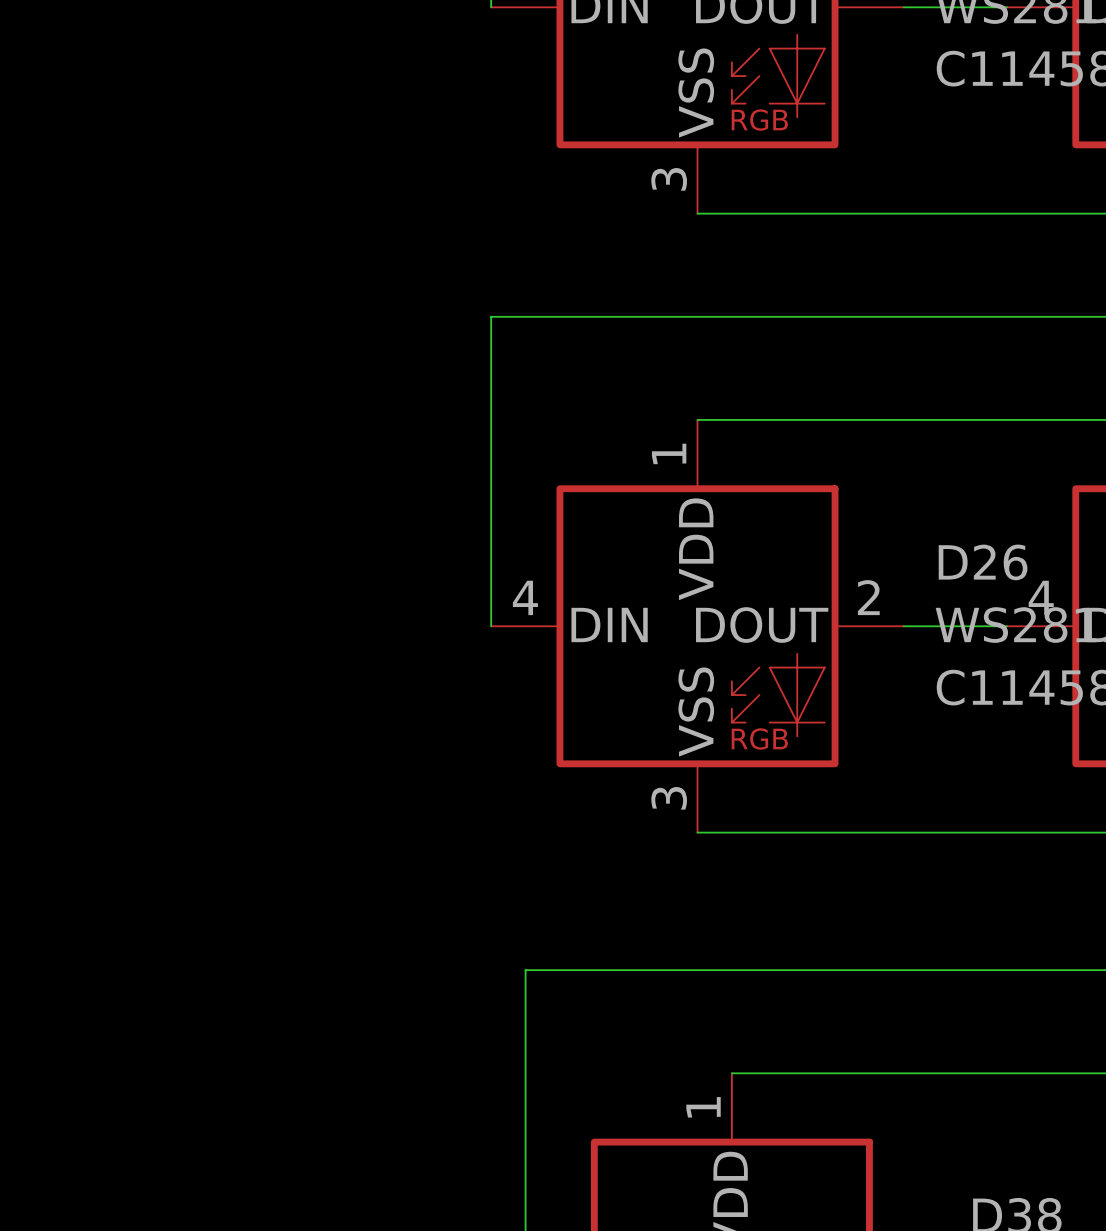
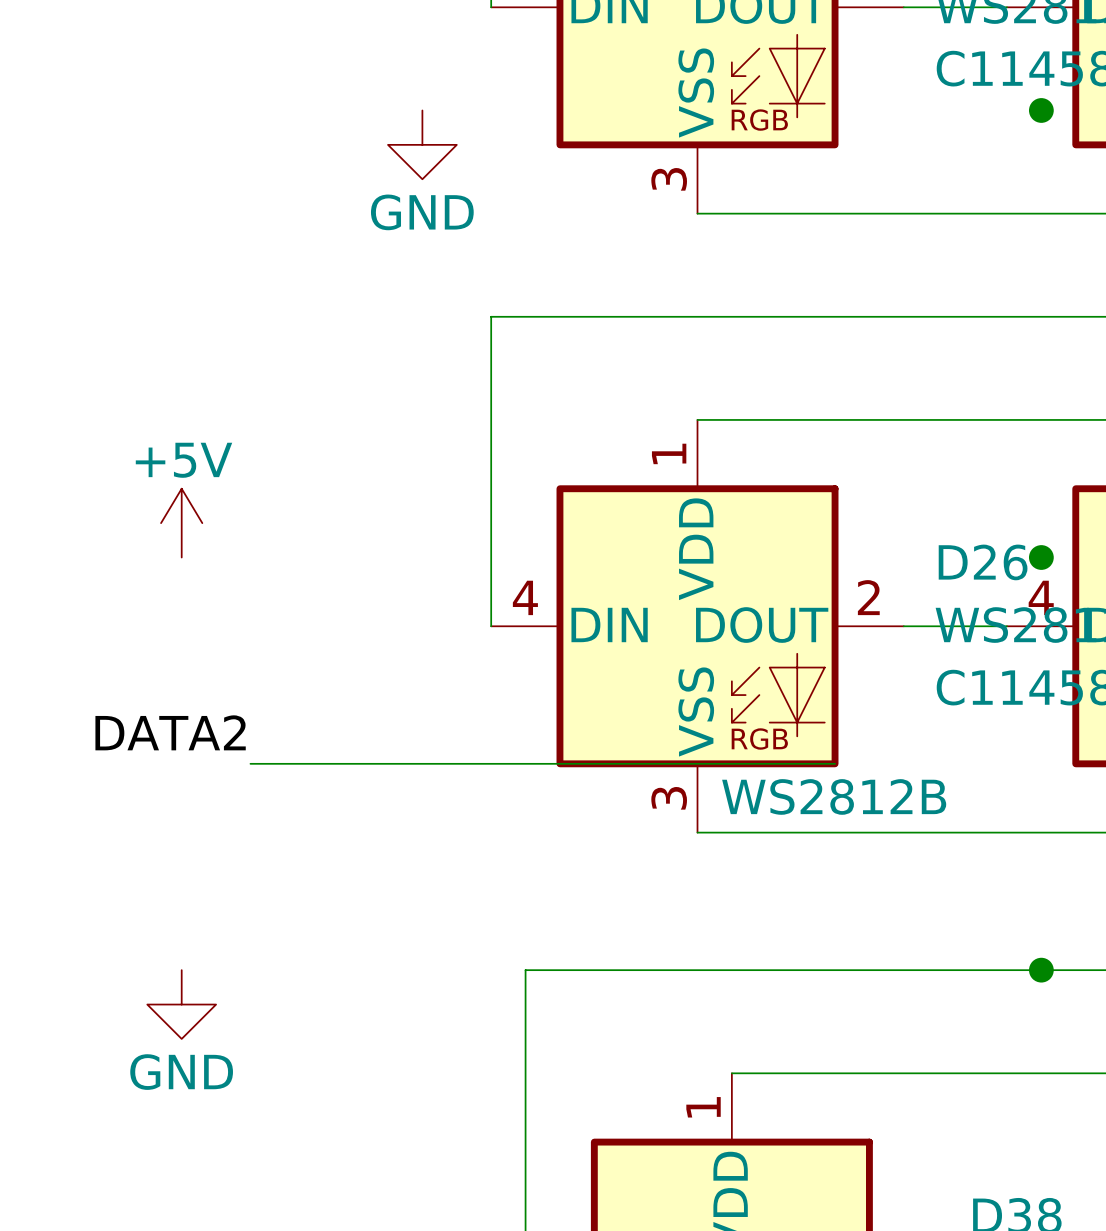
junction: none -> (1041, 110)
power symbol: none -> GND (422, 144)
power symbol: none -> +5V (181, 523)
junction: none -> (1041, 557)
label: none -> DATA2 (170, 732)
wire: none -> (250, 763) (835, 763)
D26 text: none -> WS2812B (834, 796)
junction: none -> (1041, 970)
power symbol: none -> GND (181, 1004)

